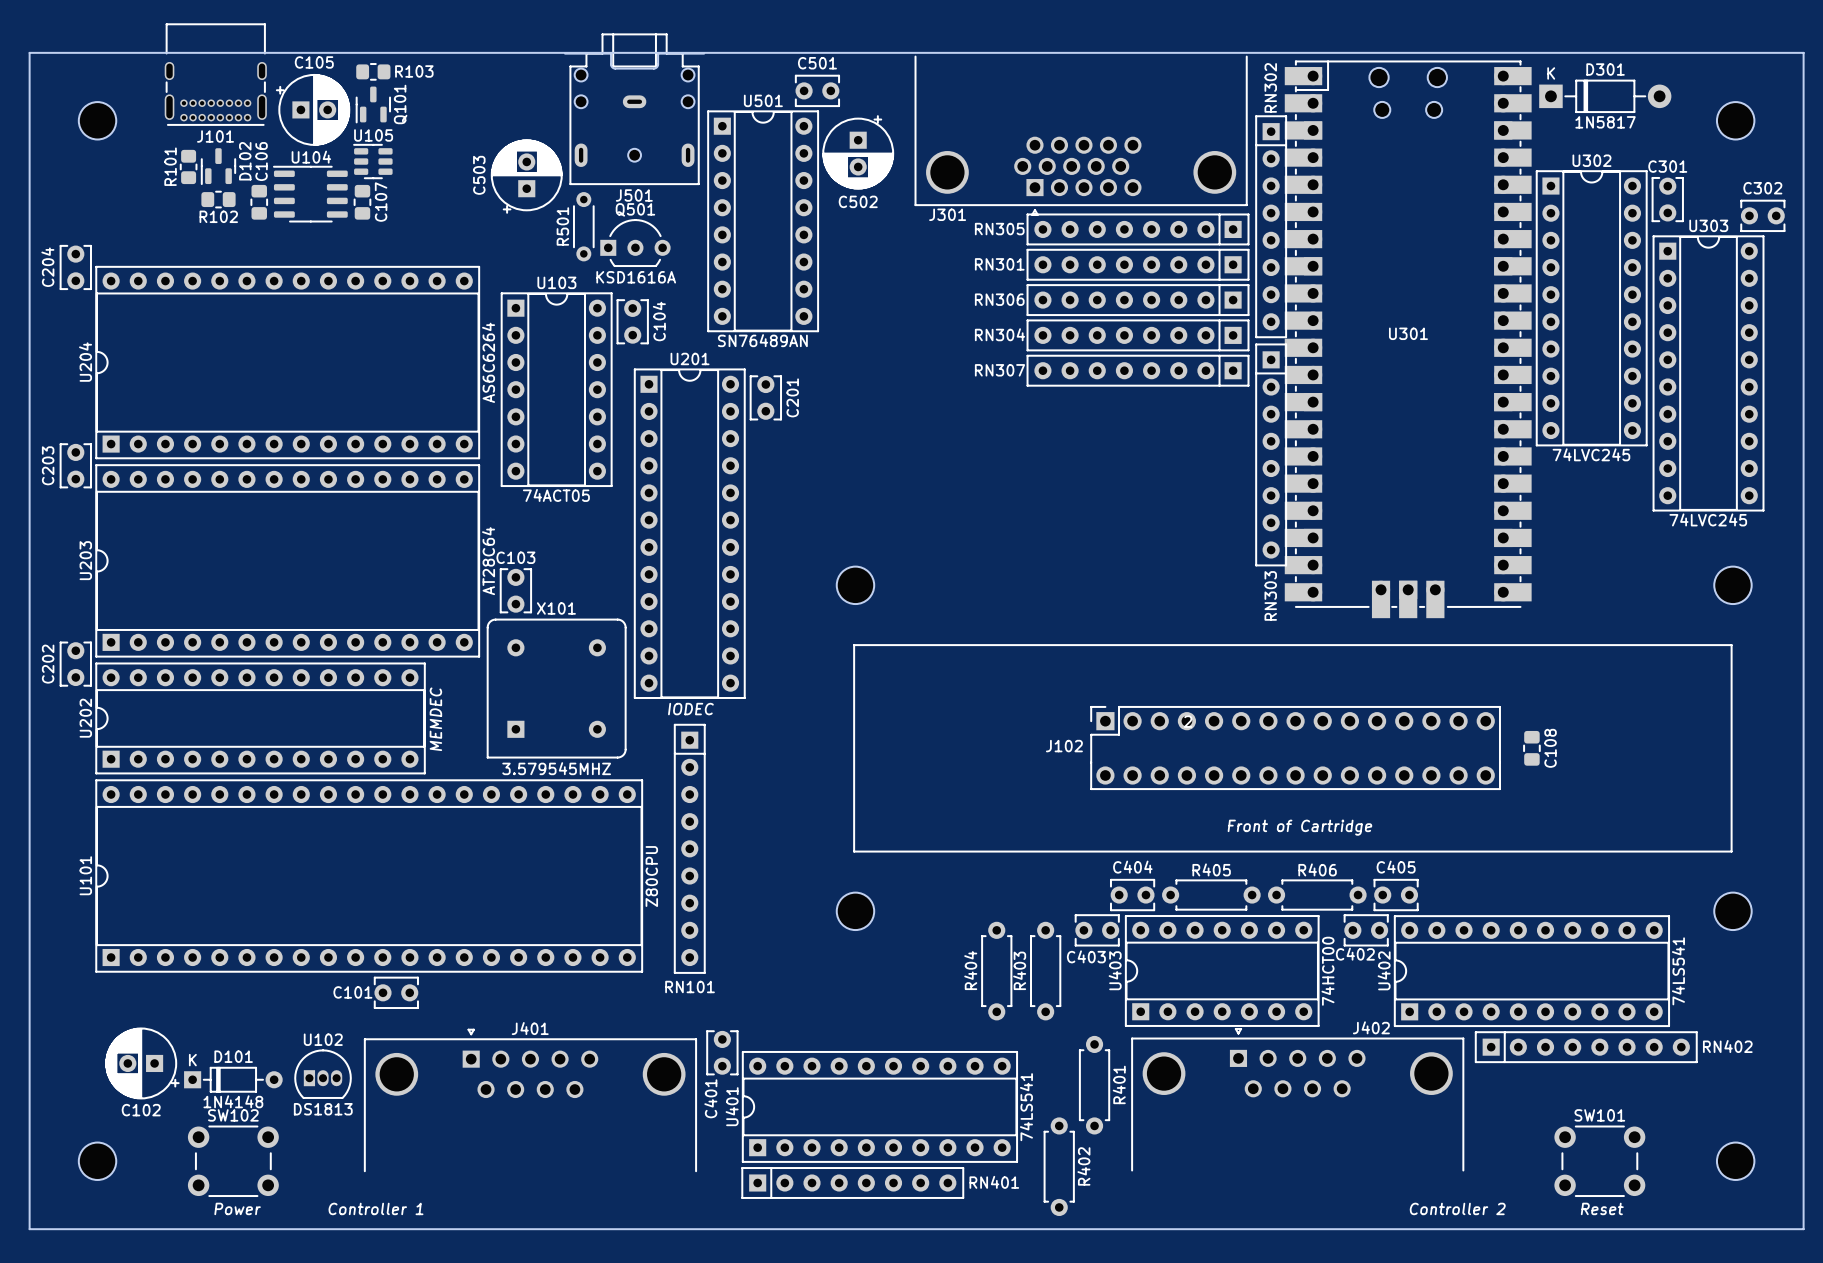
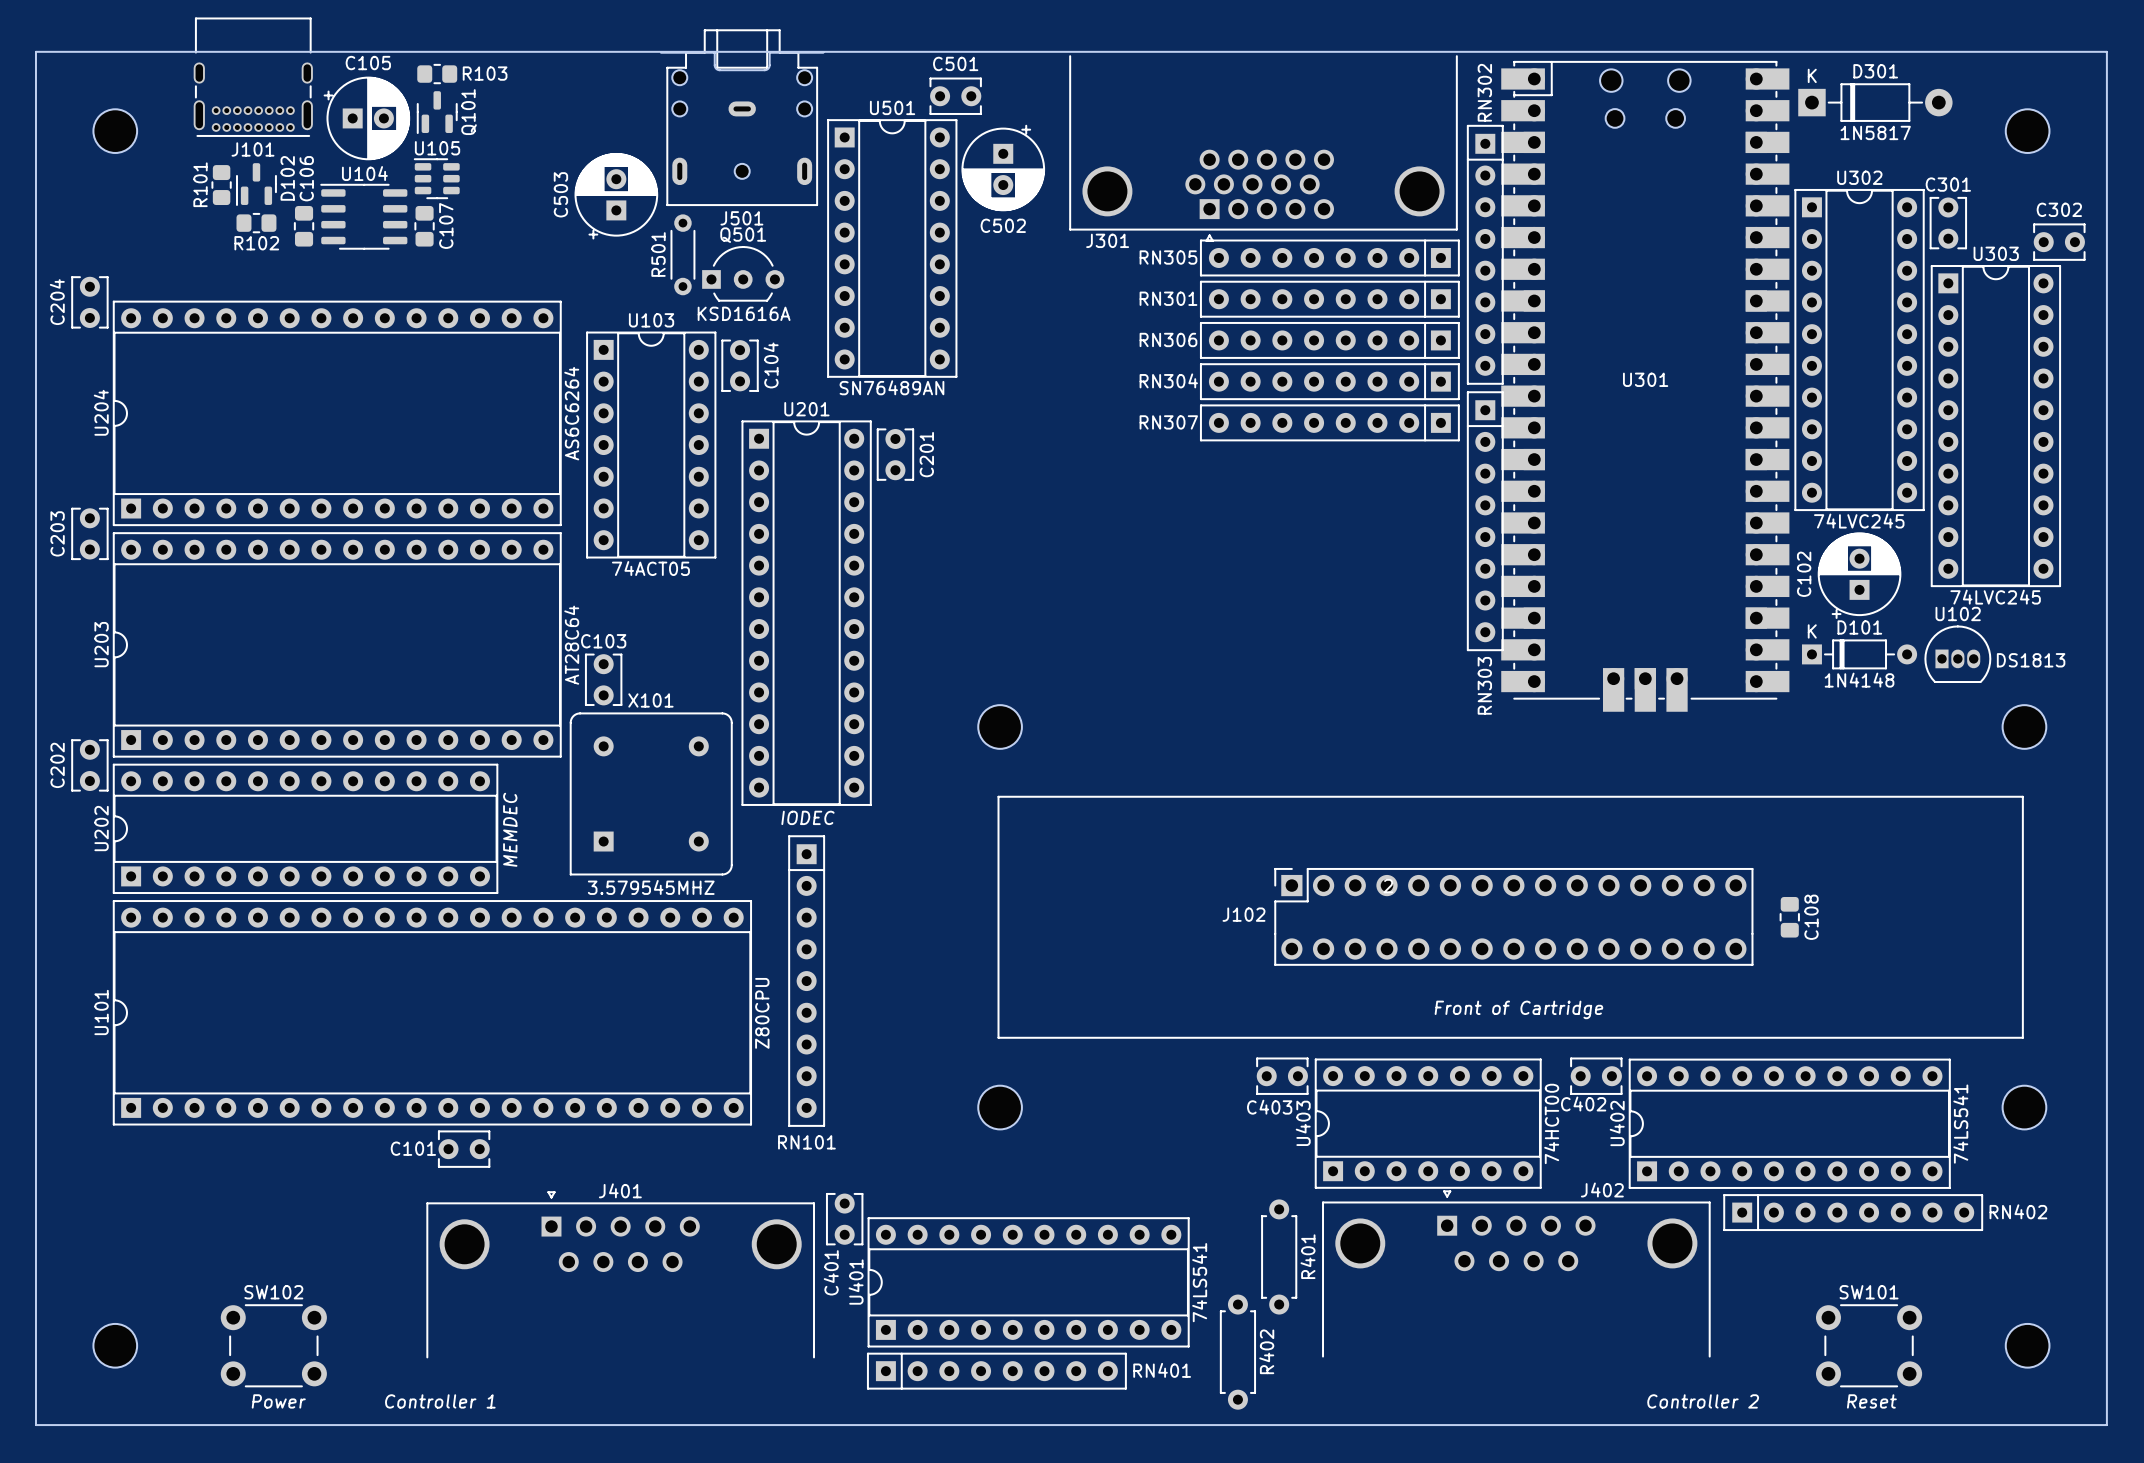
part position: (855, 585) -> (1000, 726)
part position: (1732, 585) -> (2024, 726)
line: (854, 690) (854, 645) (1731, 645) (1731, 690) -> (998, 796) (2022, 796)
J102 position: (1295, 748) -> (1513, 916)
C108 position: (1531, 748) -> (1789, 917)
text position: Front of Cartridge (1299, 827) -> Front of Cartridge (1518, 1009)
line: (854, 851) (1731, 851) -> (998, 984) (998, 1037) (2022, 1037) (2022, 984)
C404: (1132, 895) -> none
R405: (1211, 895) -> none
R406: (1317, 895) -> none
C405: (1396, 895) -> none
part position: (855, 911) -> (1000, 1107)
part position: (1732, 911) -> (2024, 1107)
R404: (996, 971) -> none
R403: (1045, 971) -> none
C102 rotation: 0° (142, 1063) -> 90° clockwise (1859, 575)
C102 position: (142, 1063) -> (1859, 575)
U102 position: (323, 1074) -> (1957, 654)
D101 position: (233, 1079) -> (1859, 654)
U102 value position: DS1813 (323, 1109) -> DS1813 (2031, 660)

